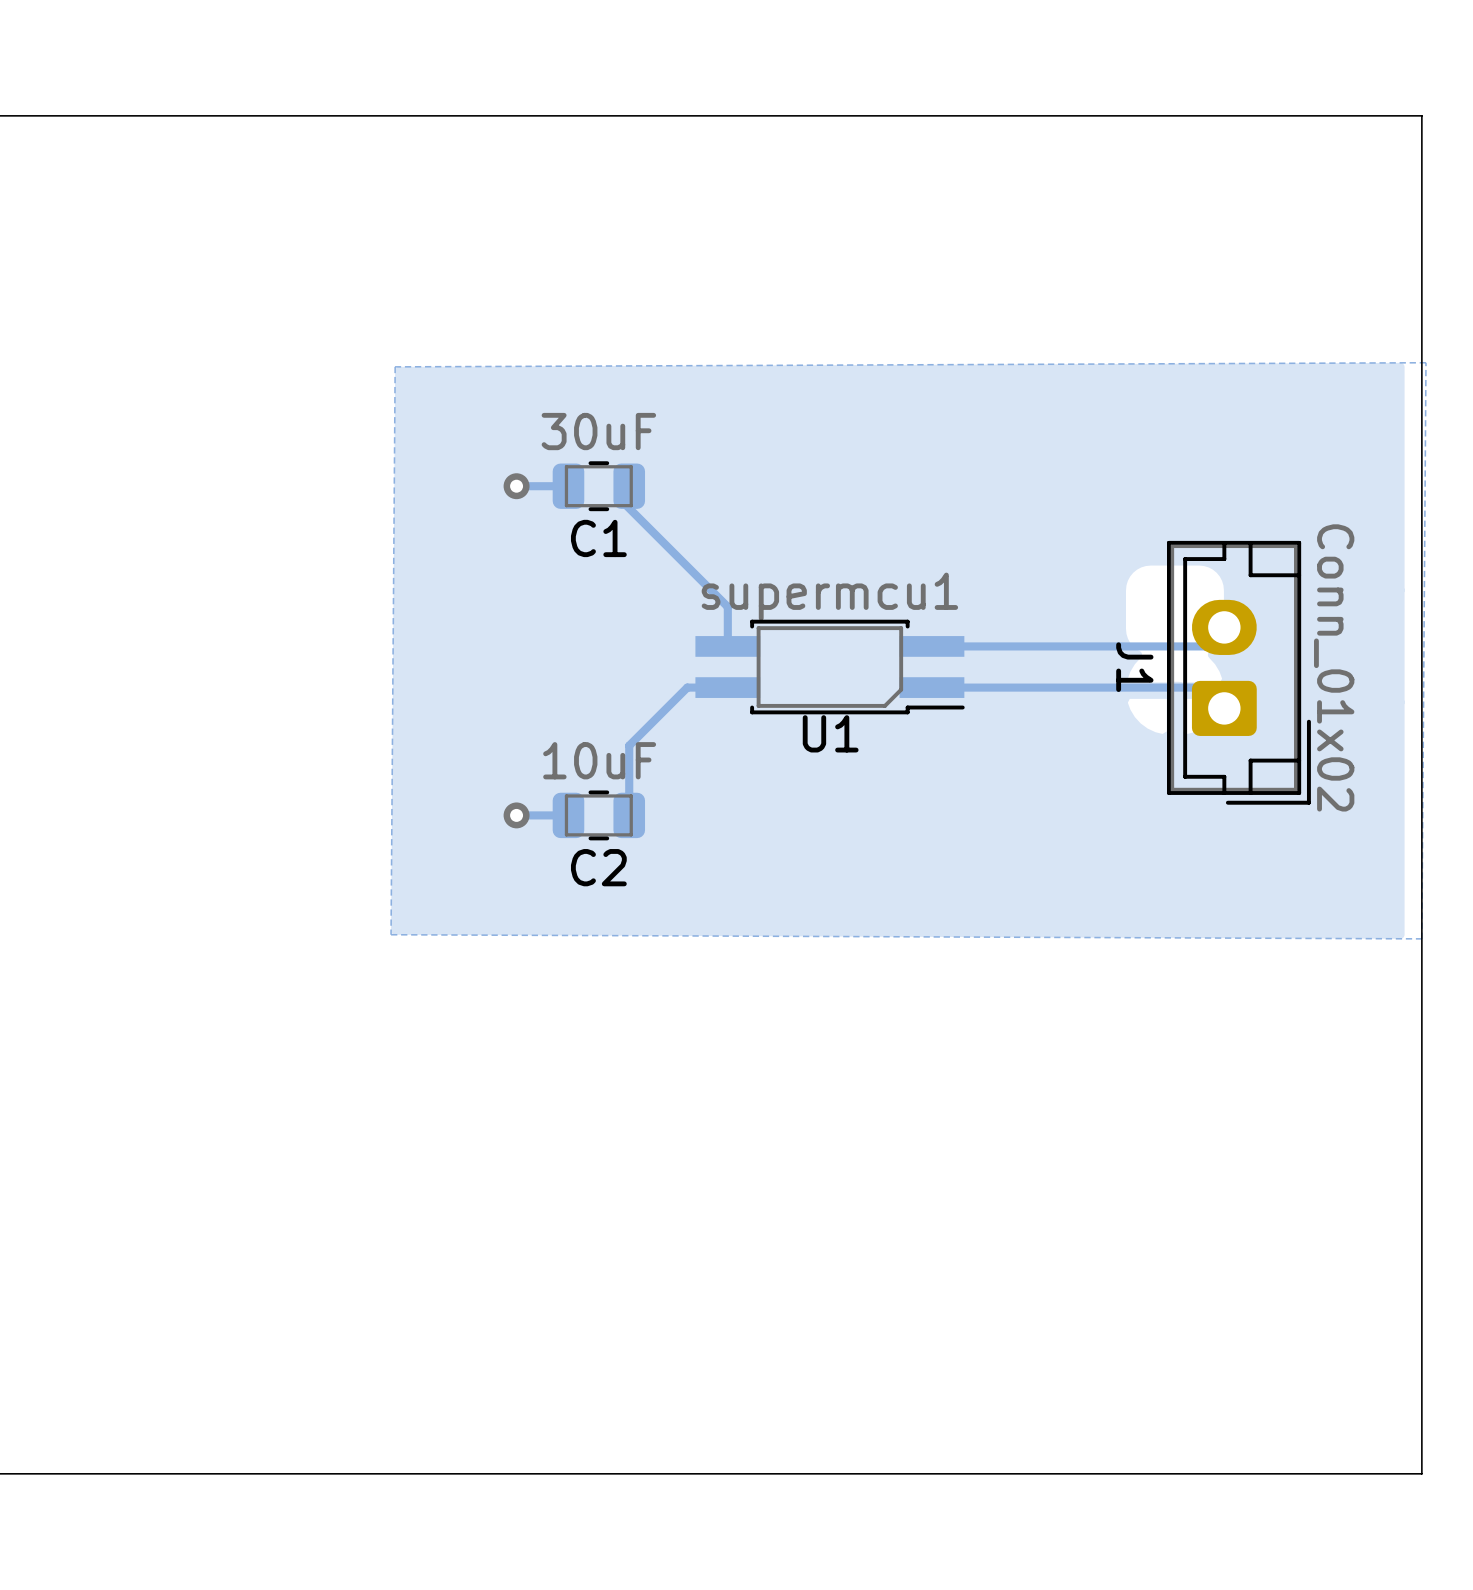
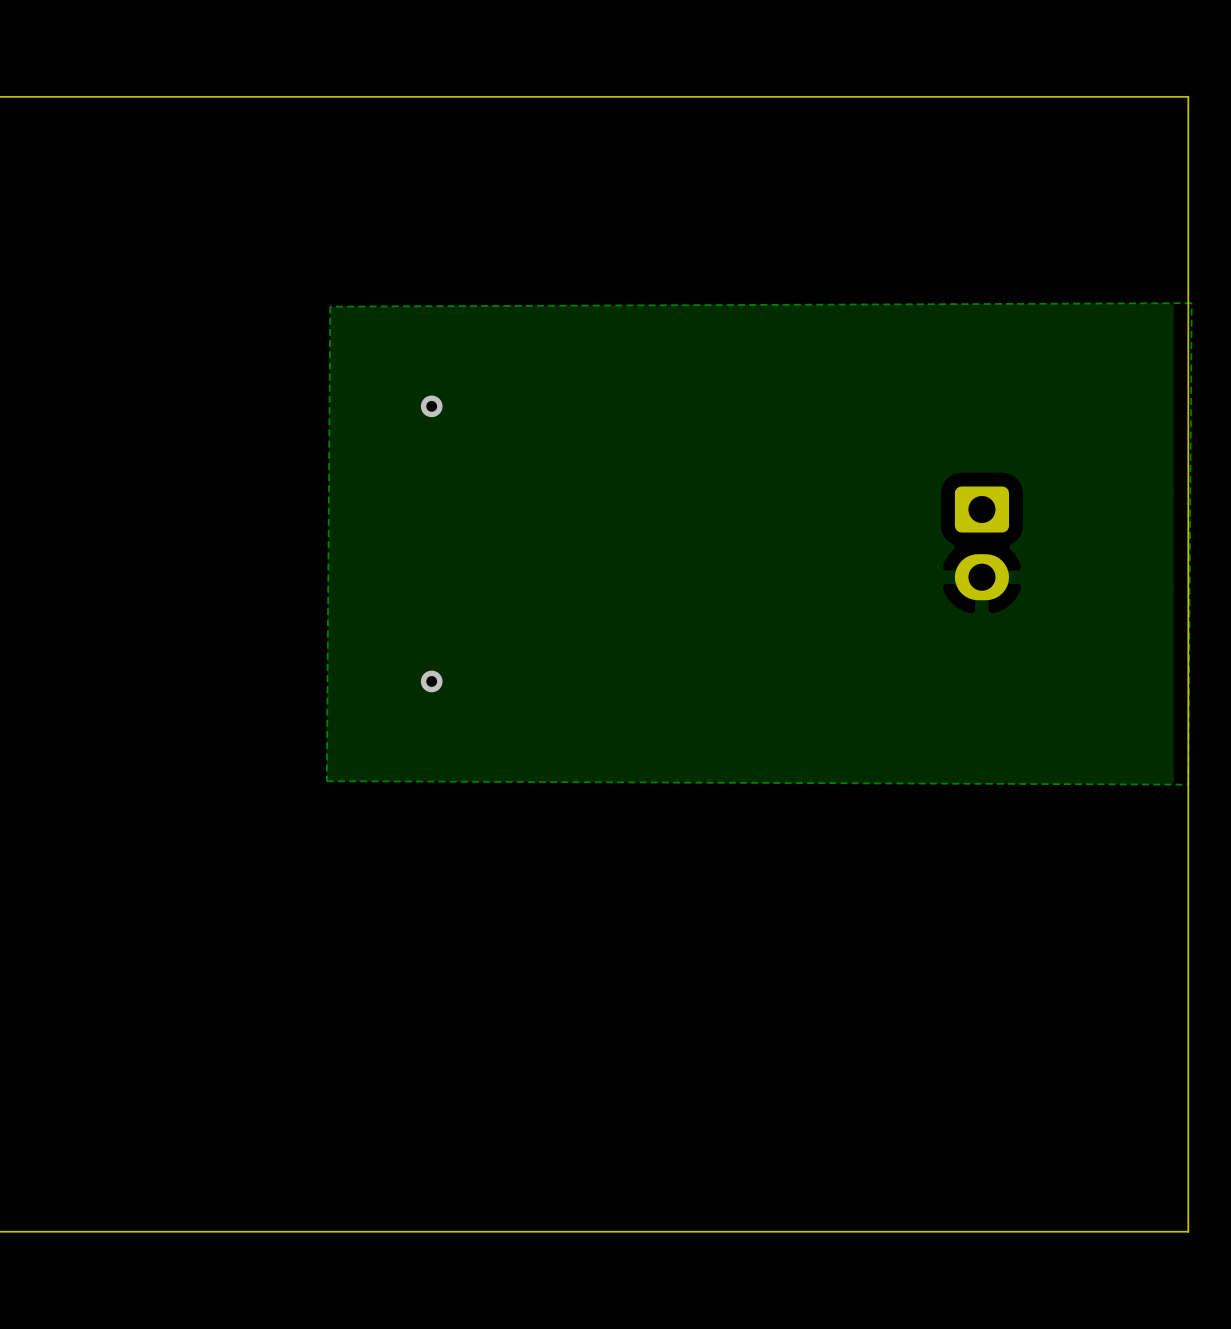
track: (568, 486) (516, 486) -> none
C1: 30uF (598, 486) -> none
track: (629, 486) (629, 496) (623, 502) (727, 606) (727, 646) -> none
track: (1224, 627) (1205, 646) (931, 646) -> none
U1: supermcu1 (830, 667) -> none
J1 side: bottom (1238, 672) -> top (981, 543)
track: (727, 687) (687, 687) (629, 745) (629, 815) -> none
track: (931, 687) (1203, 687) (1224, 708) -> none
track: (568, 815) (516, 815) -> none
C2: 10uF (598, 815) -> none

